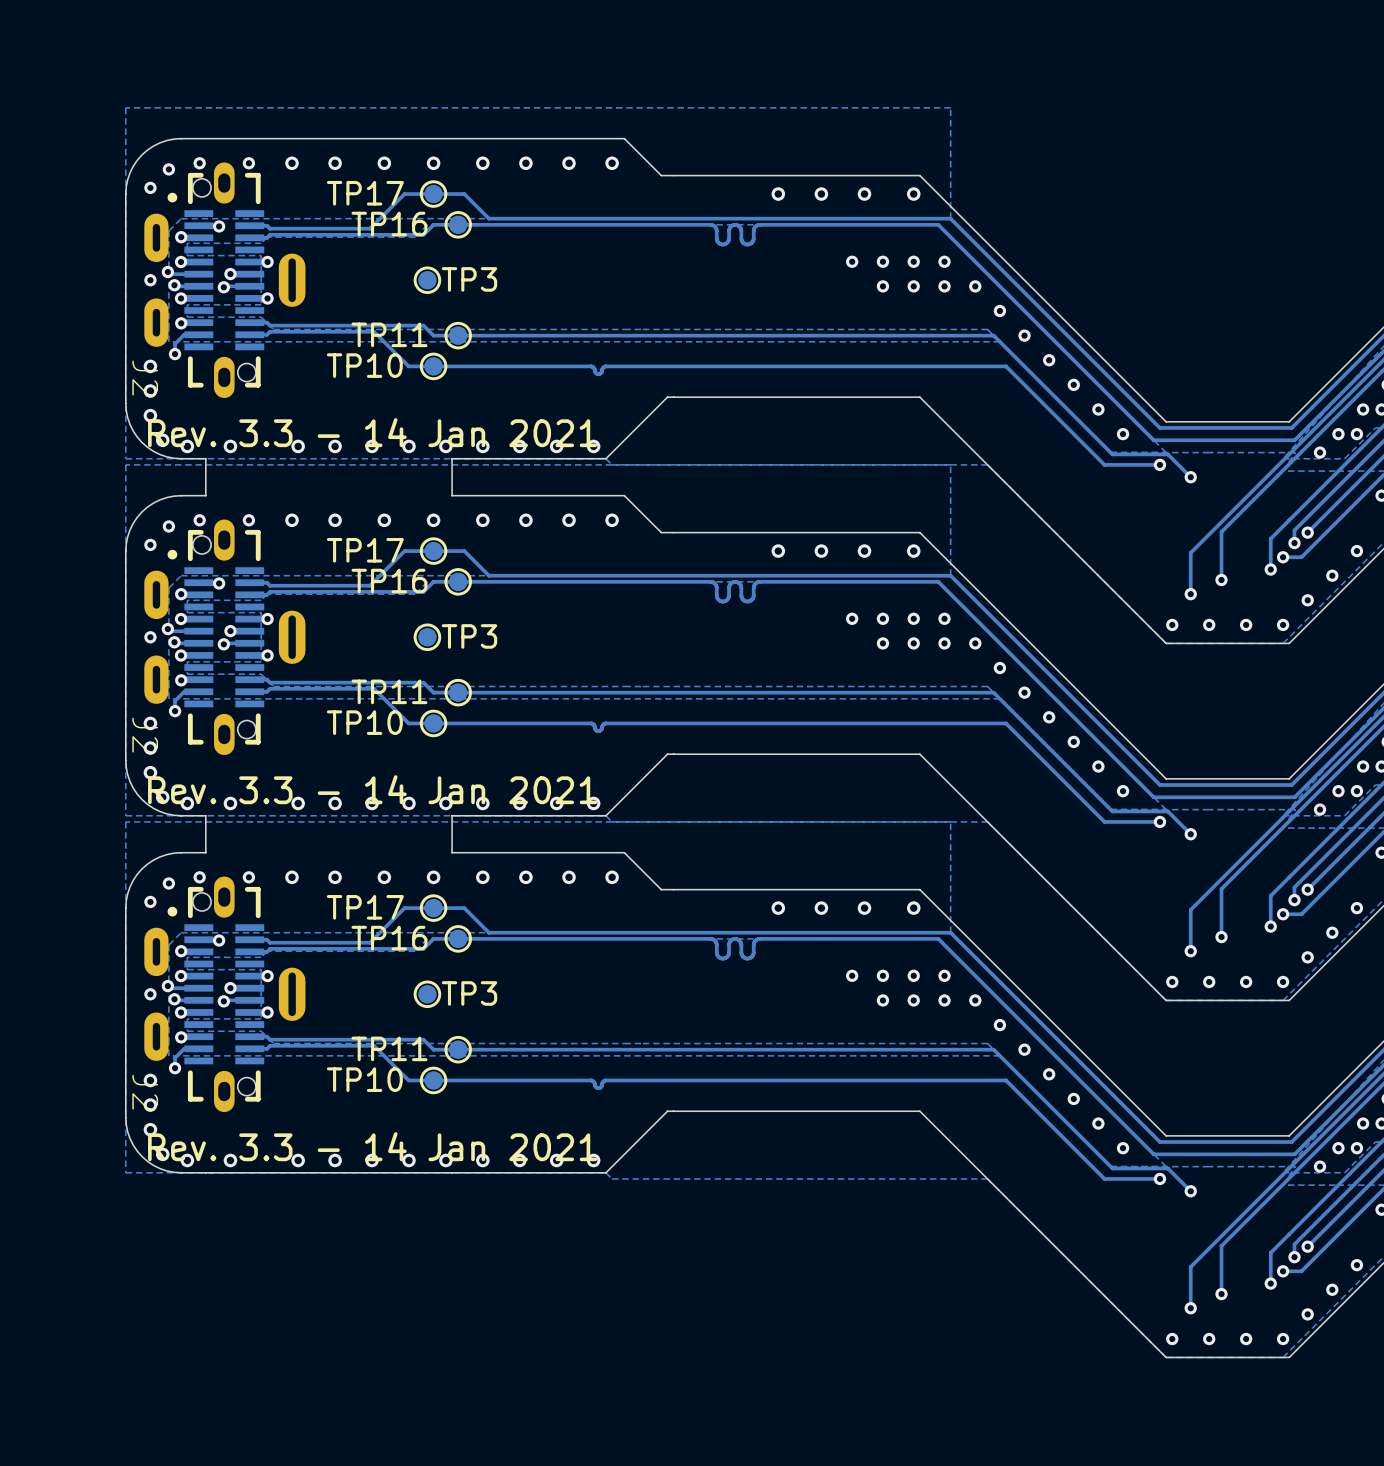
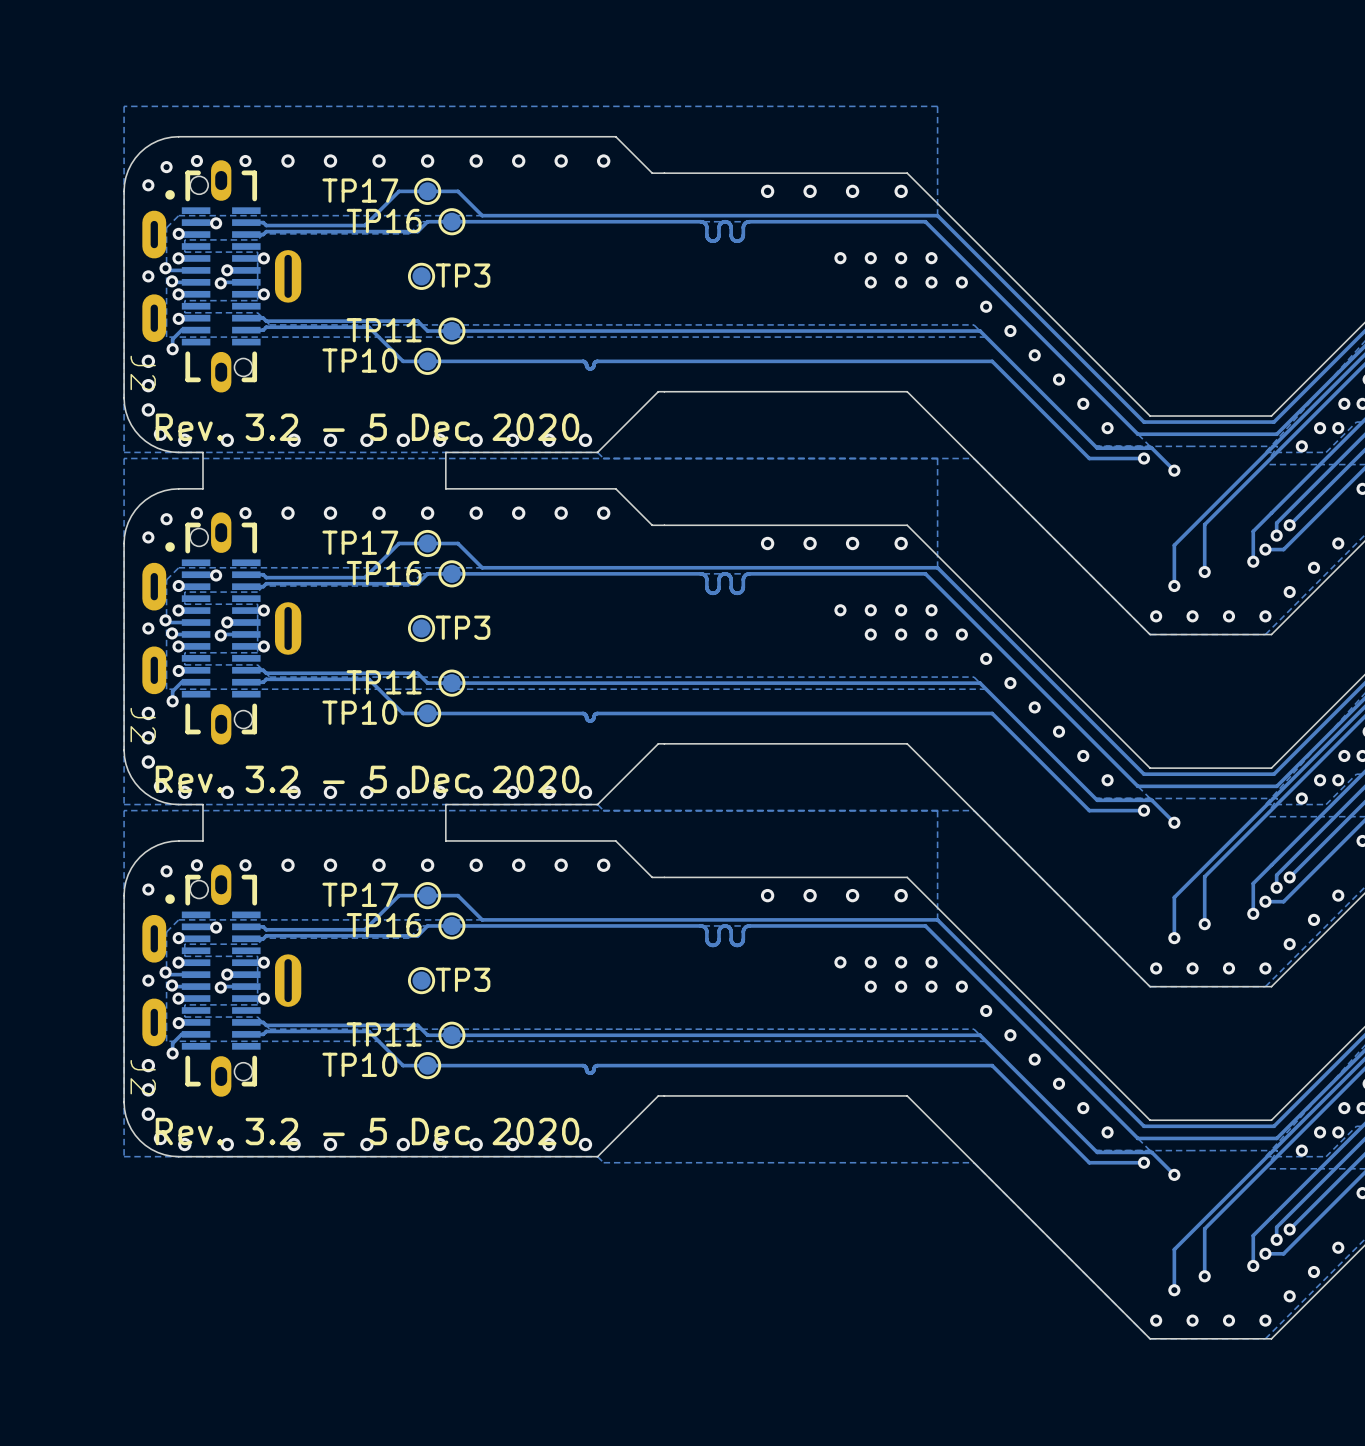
text: Rev. 3.3 - 14 Jan 2021 (372, 432) -> Rev. 3.2 - 5 Dec 2020 (367, 427)
text: Rev. 3.3 - 14 Jan 2021 (372, 789) -> Rev. 3.2 - 5 Dec 2020 (367, 779)
text: Rev. 3.3 - 14 Jan 2021 (372, 1146) -> Rev. 3.2 - 5 Dec 2020 (367, 1131)

